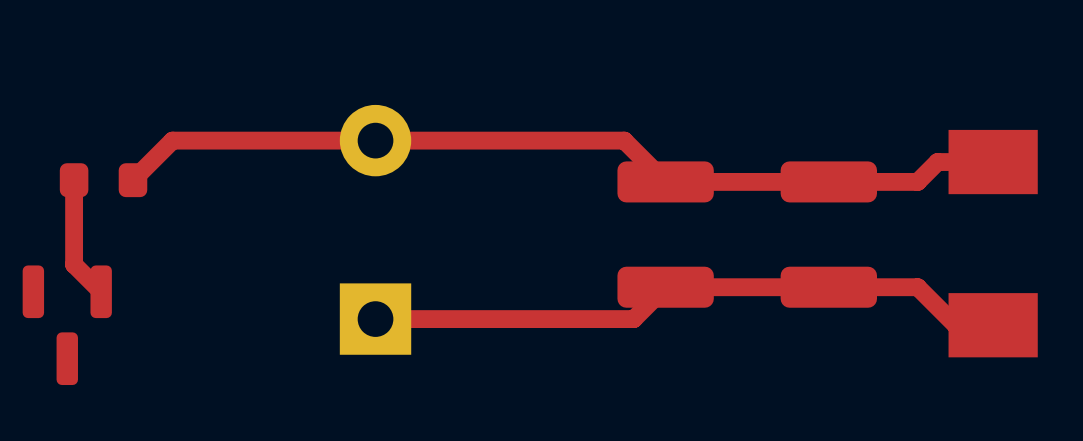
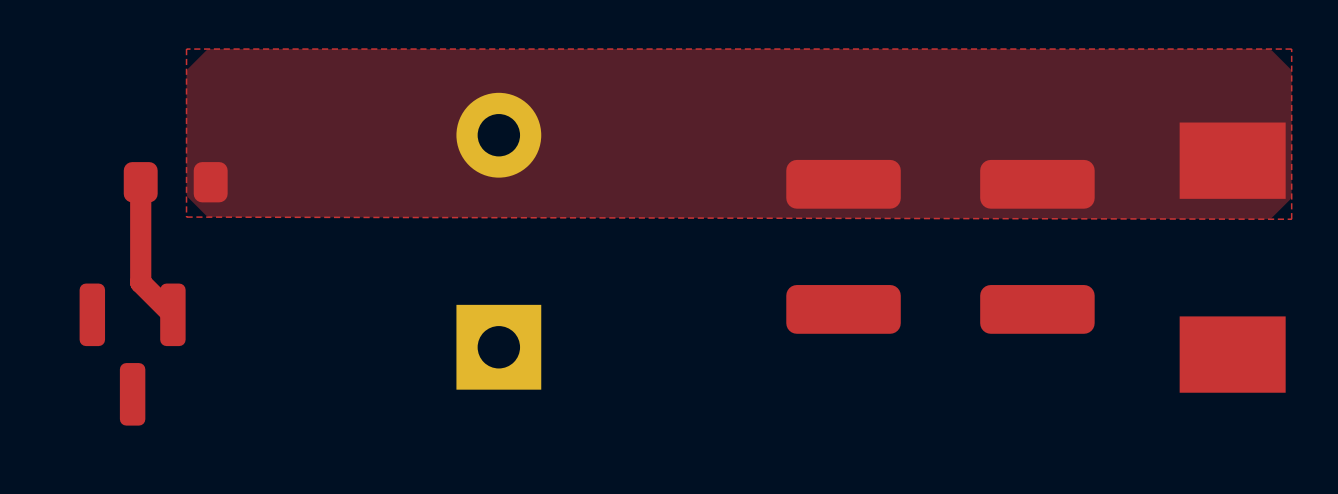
top zone outline: none -> (1291, 49) (1291, 219) (186, 217) (186, 49) (1291, 49)
top track: (993, 162) (937, 162) (917, 181) (665, 181) (624, 140) (172, 140) (132, 180) -> none
top track: (375, 319) (633, 319) (665, 287) (917, 287) (955, 325) (993, 325) -> none

